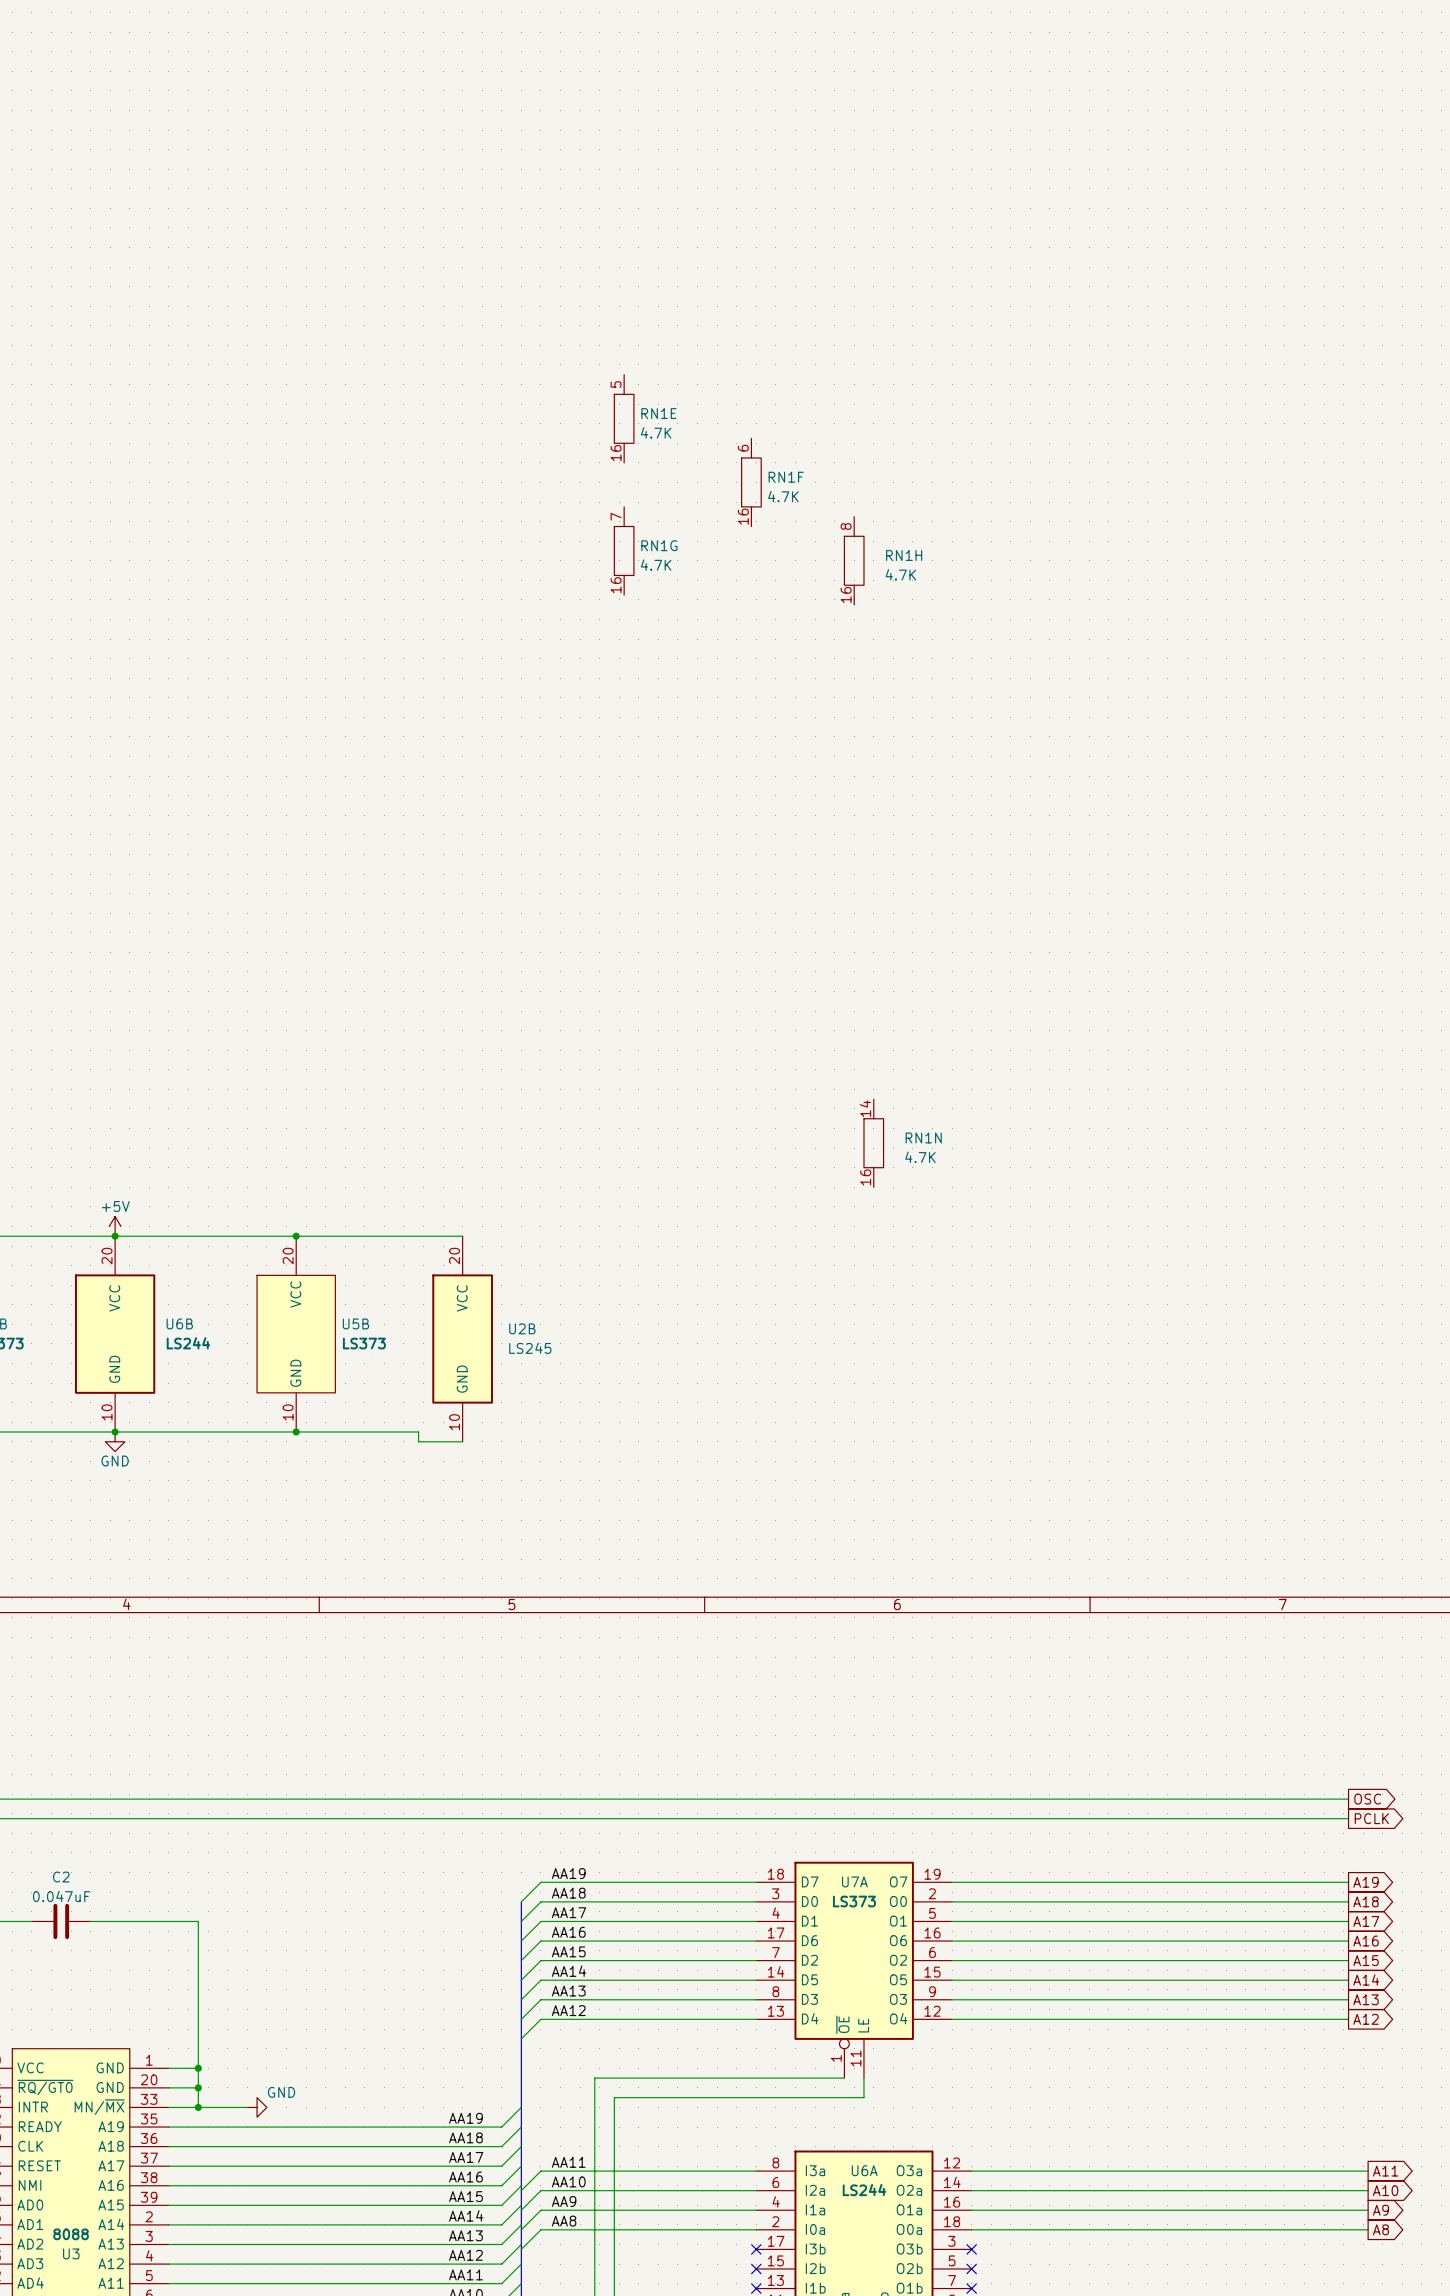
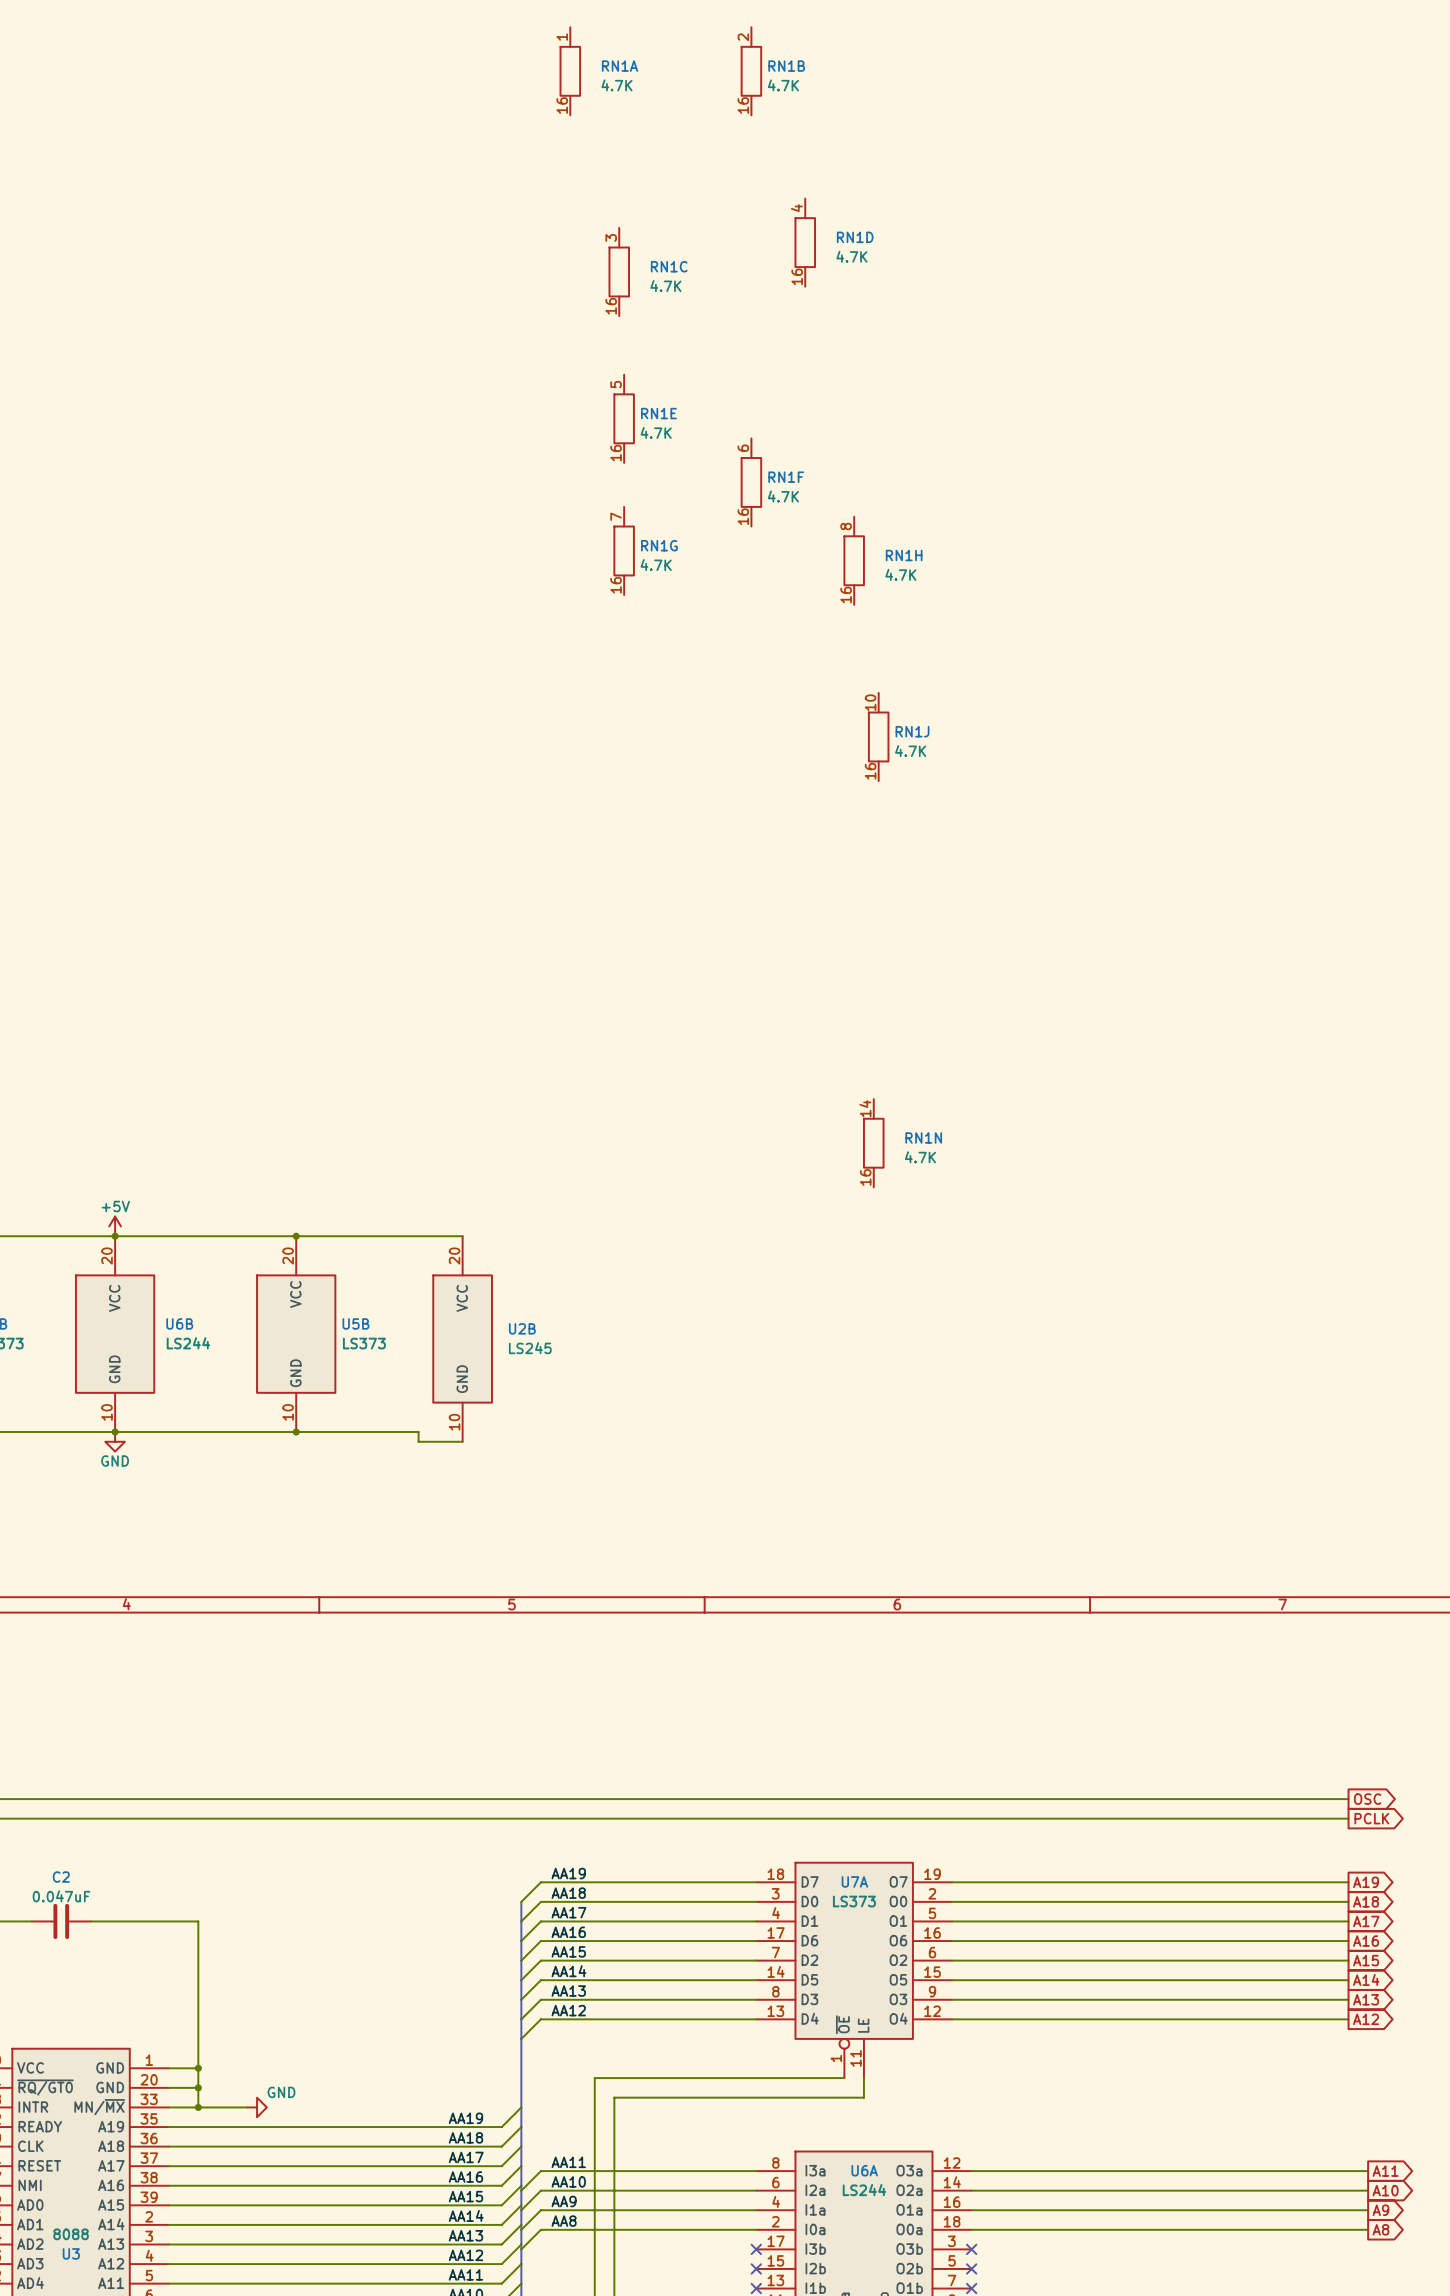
RN1A: none -> 4.7K (570, 71)
RN1B: none -> 4.7K (751, 71)
RN1D: none -> 4.7K (805, 242)
RN1C: none -> 4.7K (619, 271)
RN1J: none -> 4.7K (878, 736)

